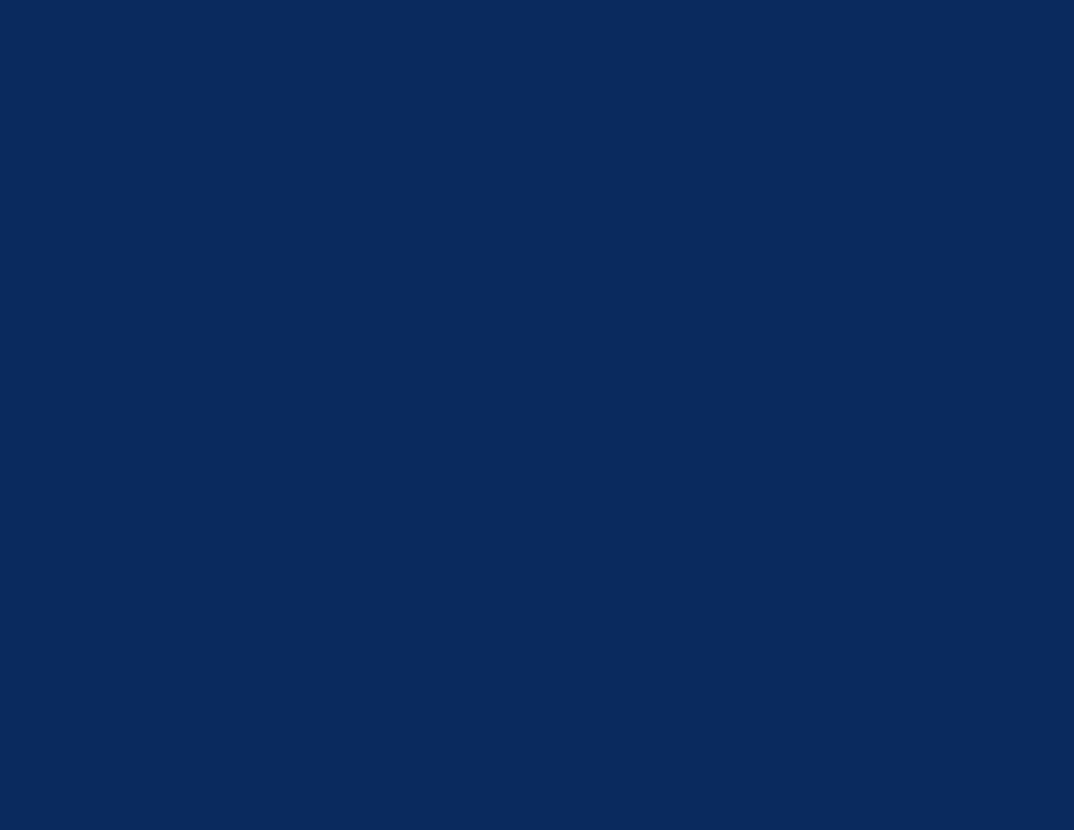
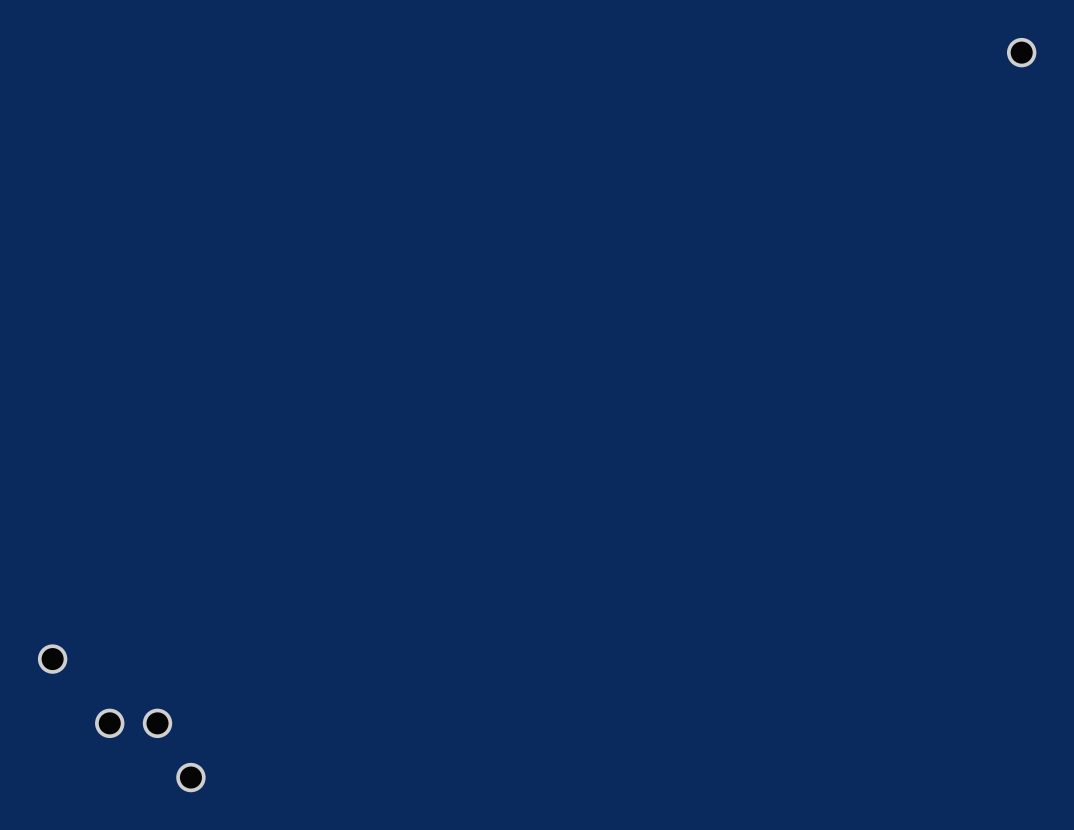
part: none -> (1021, 52)
part: none -> (52, 659)
part: none -> (109, 723)
part: none -> (157, 723)
part: none -> (190, 777)

